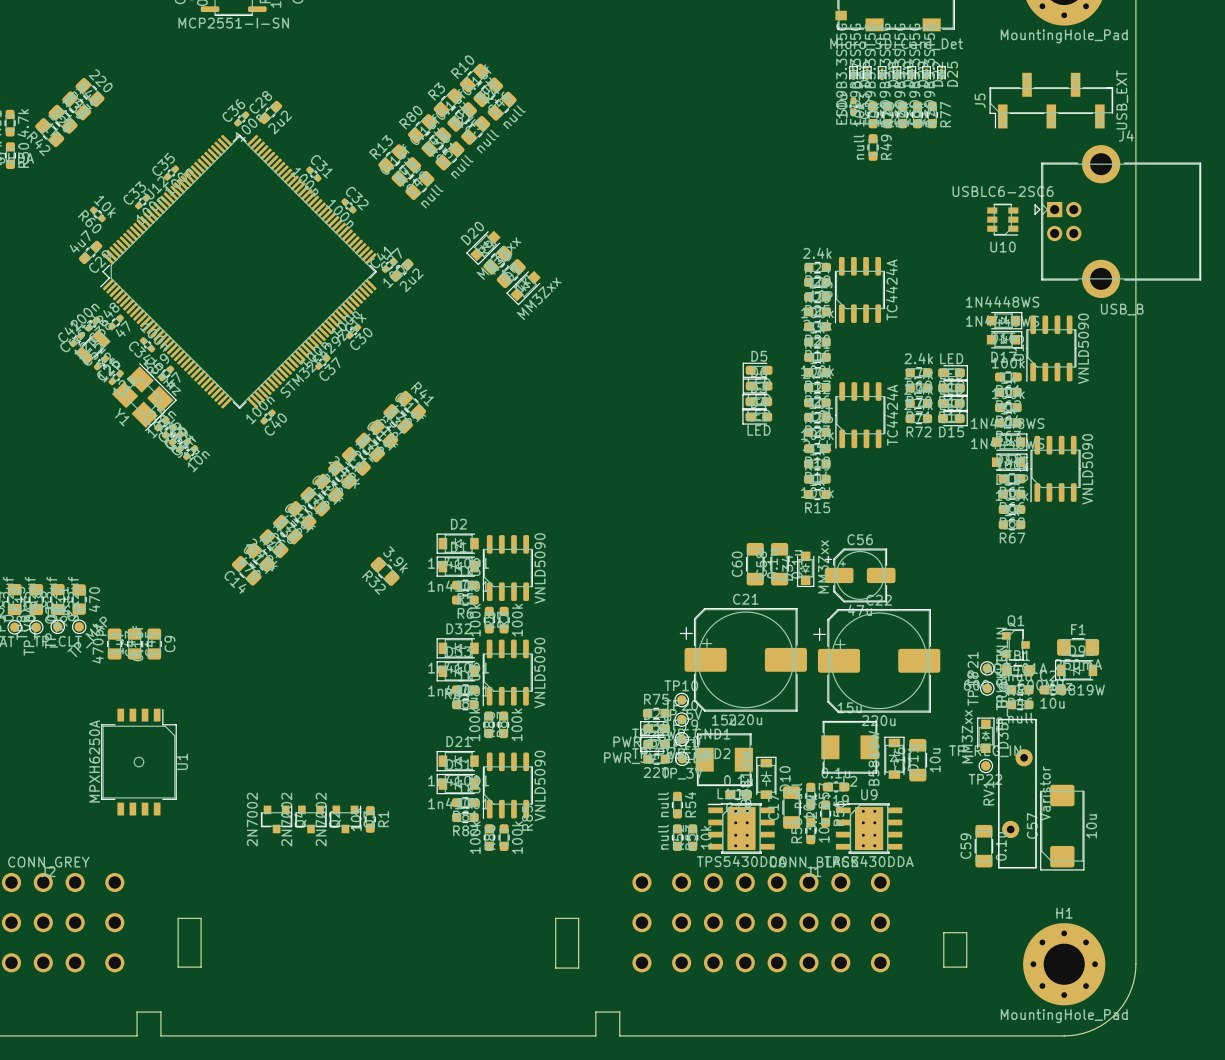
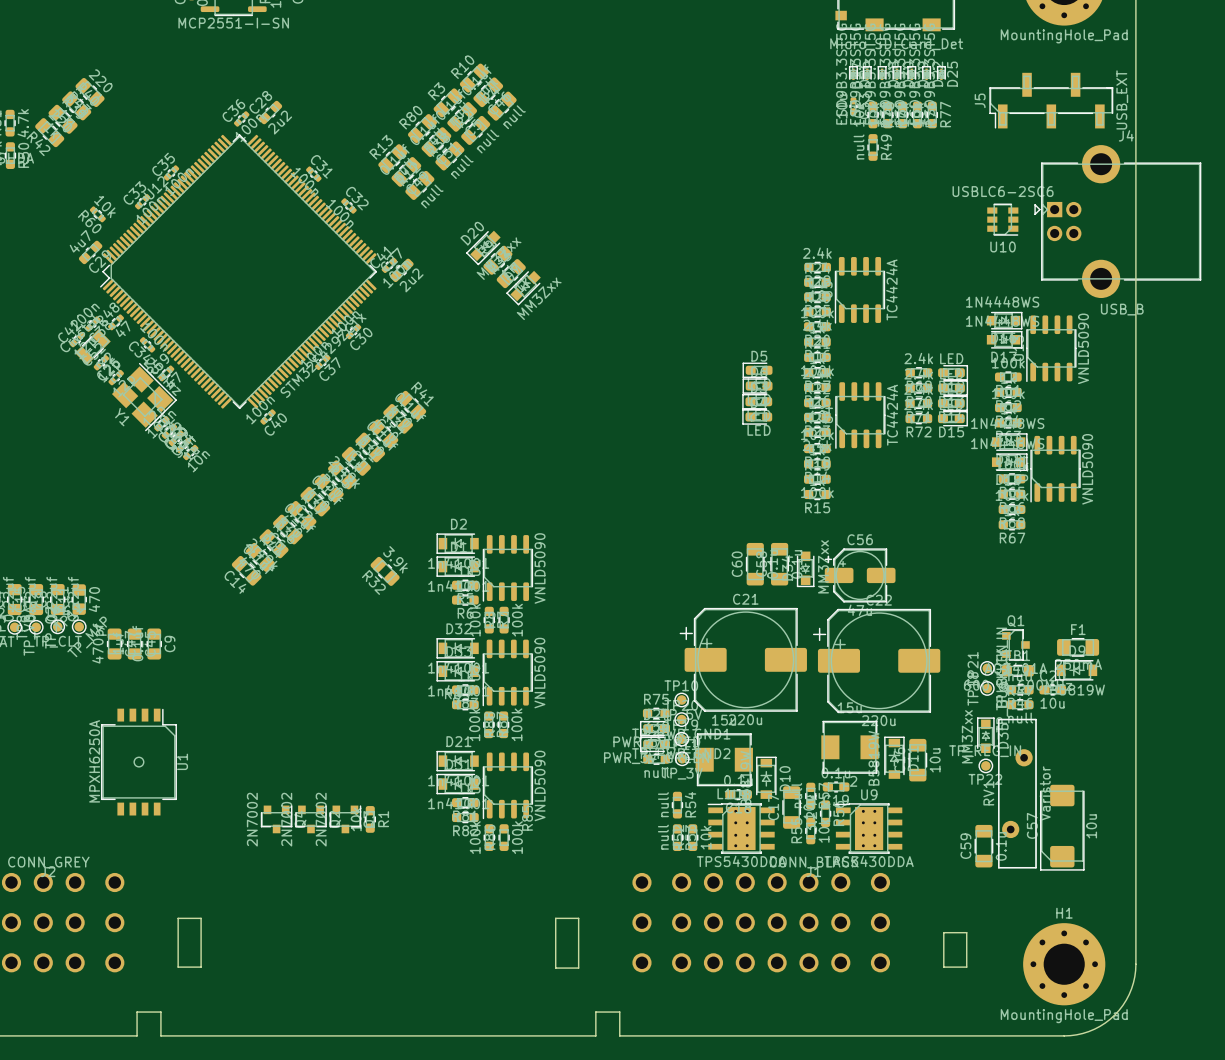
part value: 220 (656, 772) -> null (657, 772)

